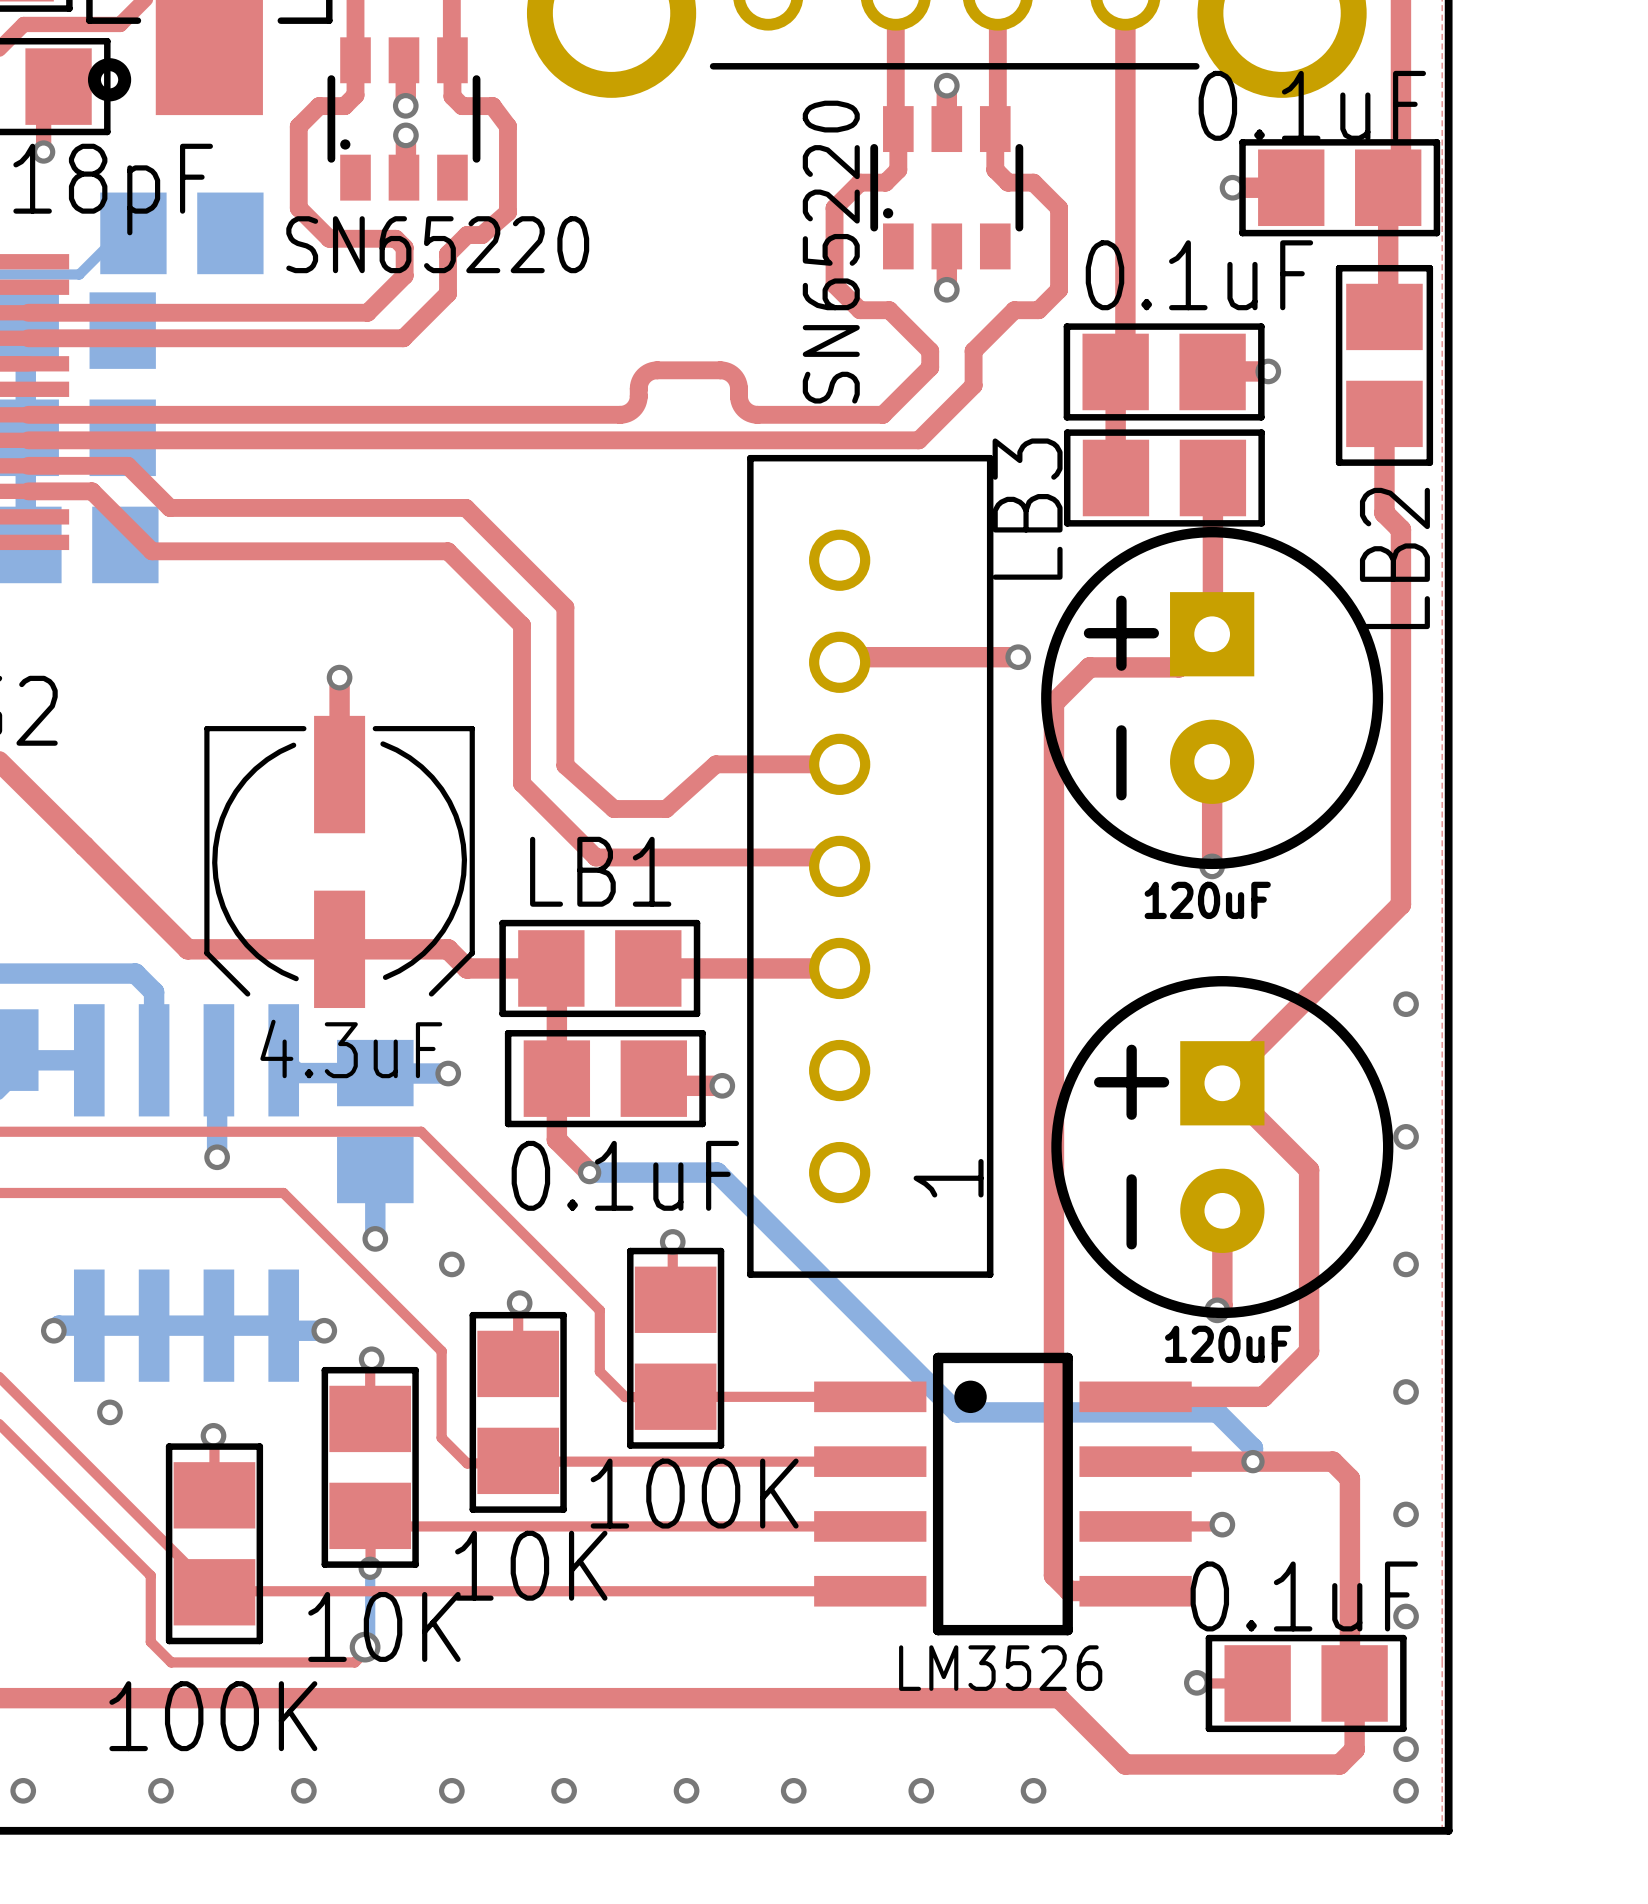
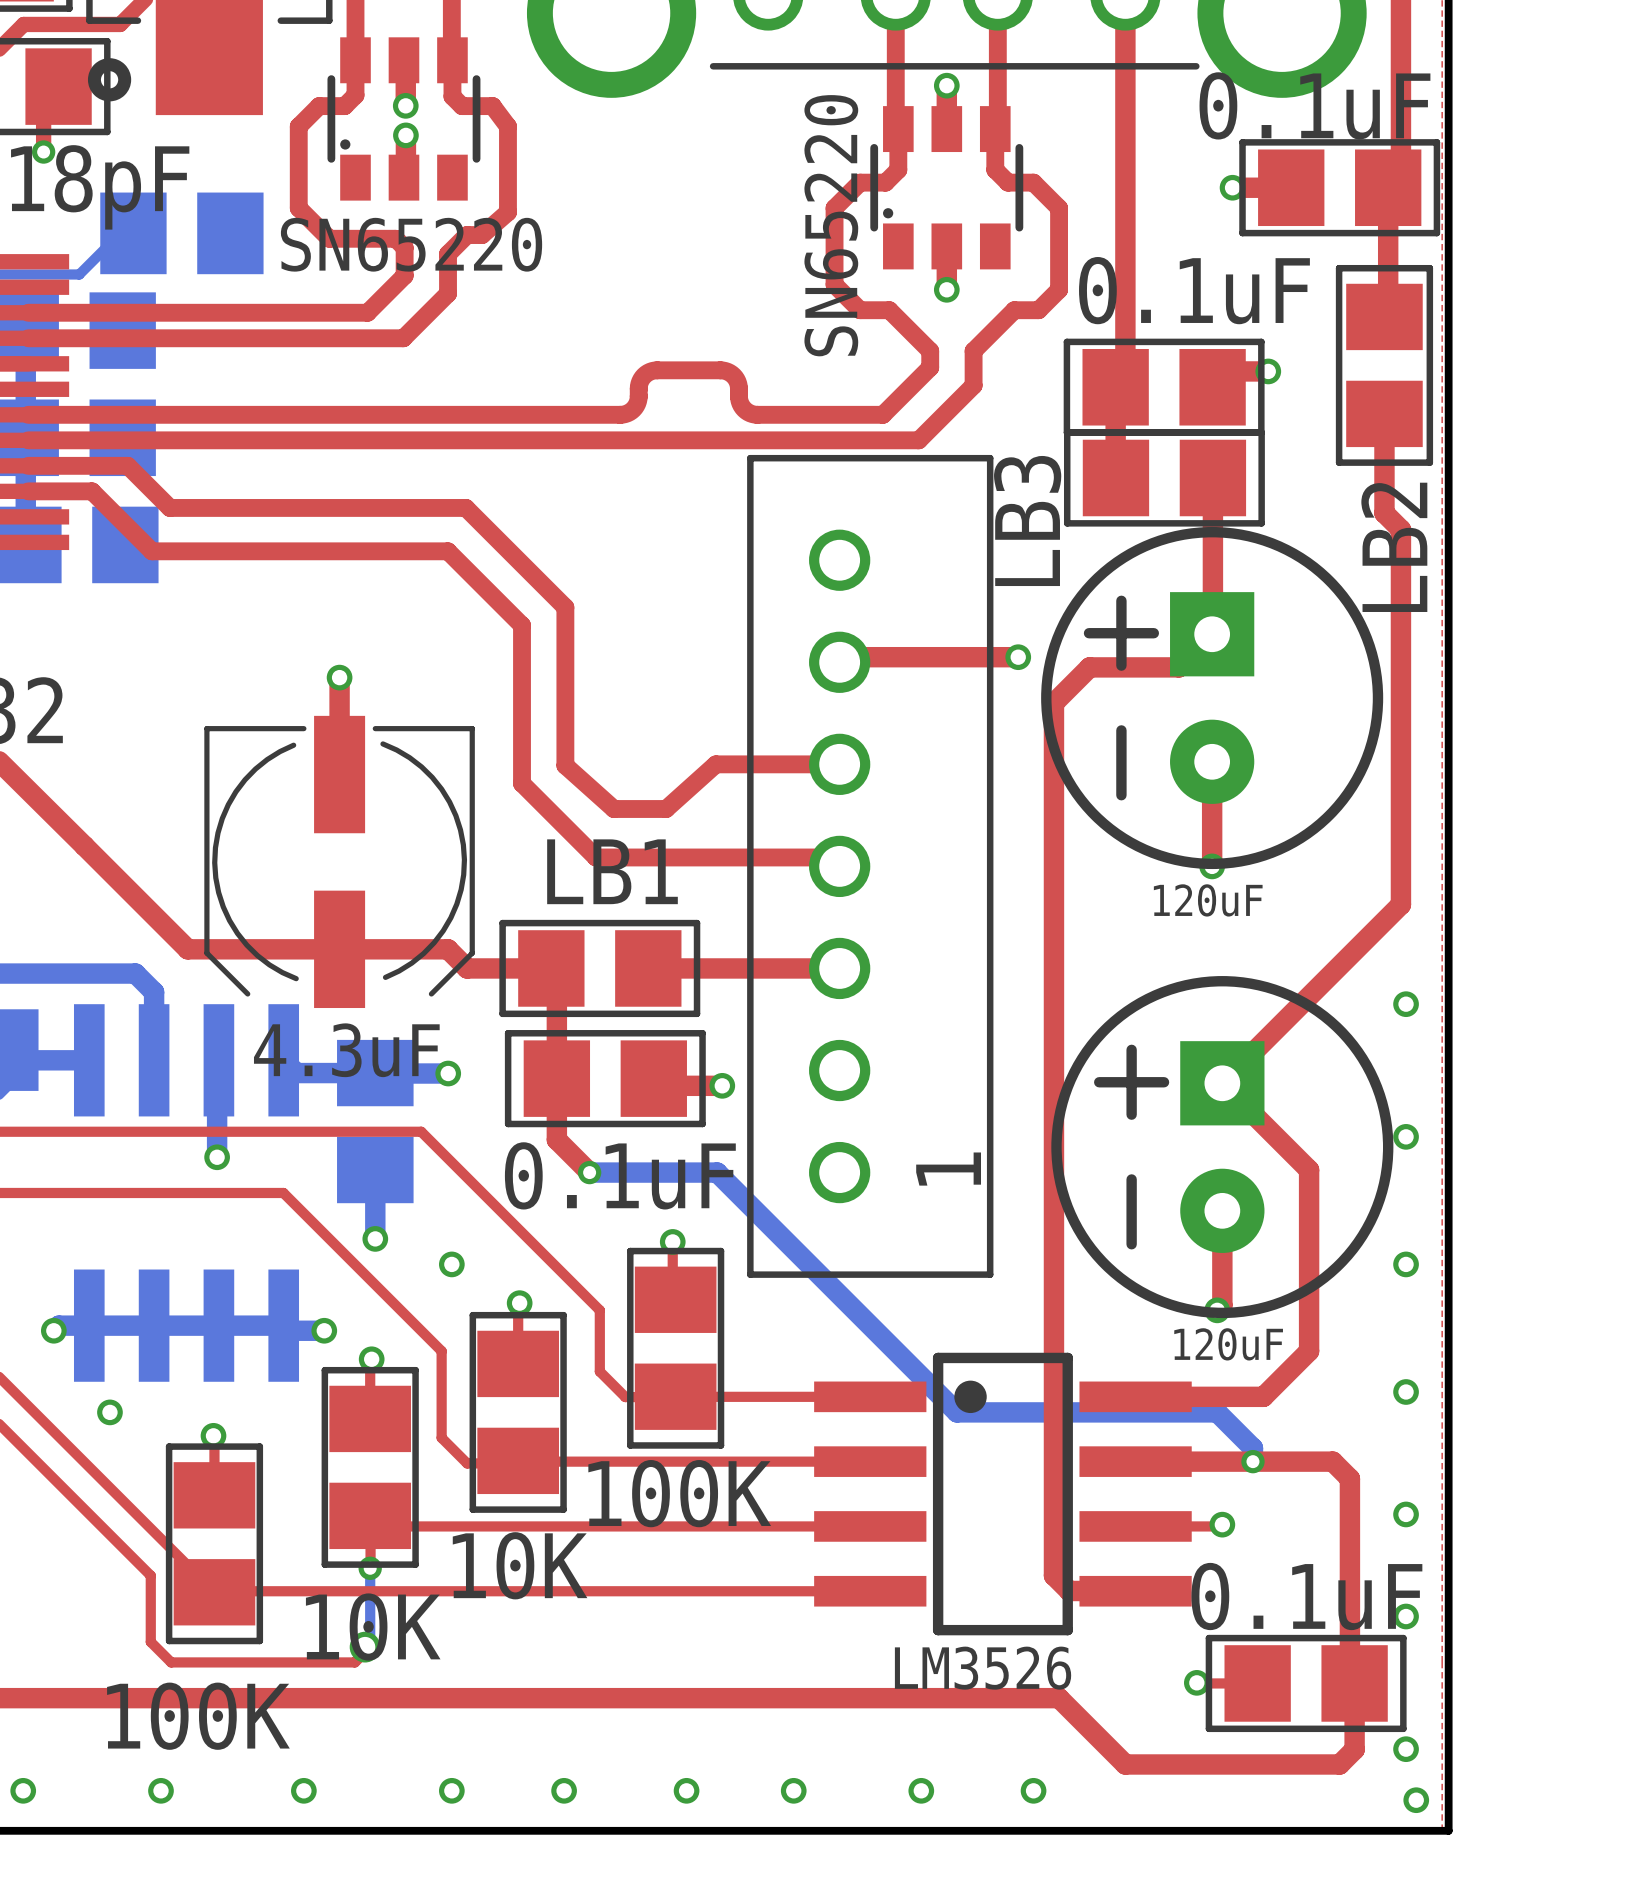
part position: (1164, 371) -> (1164, 387)
via position: (1406, 1790) -> (1416, 1800)

